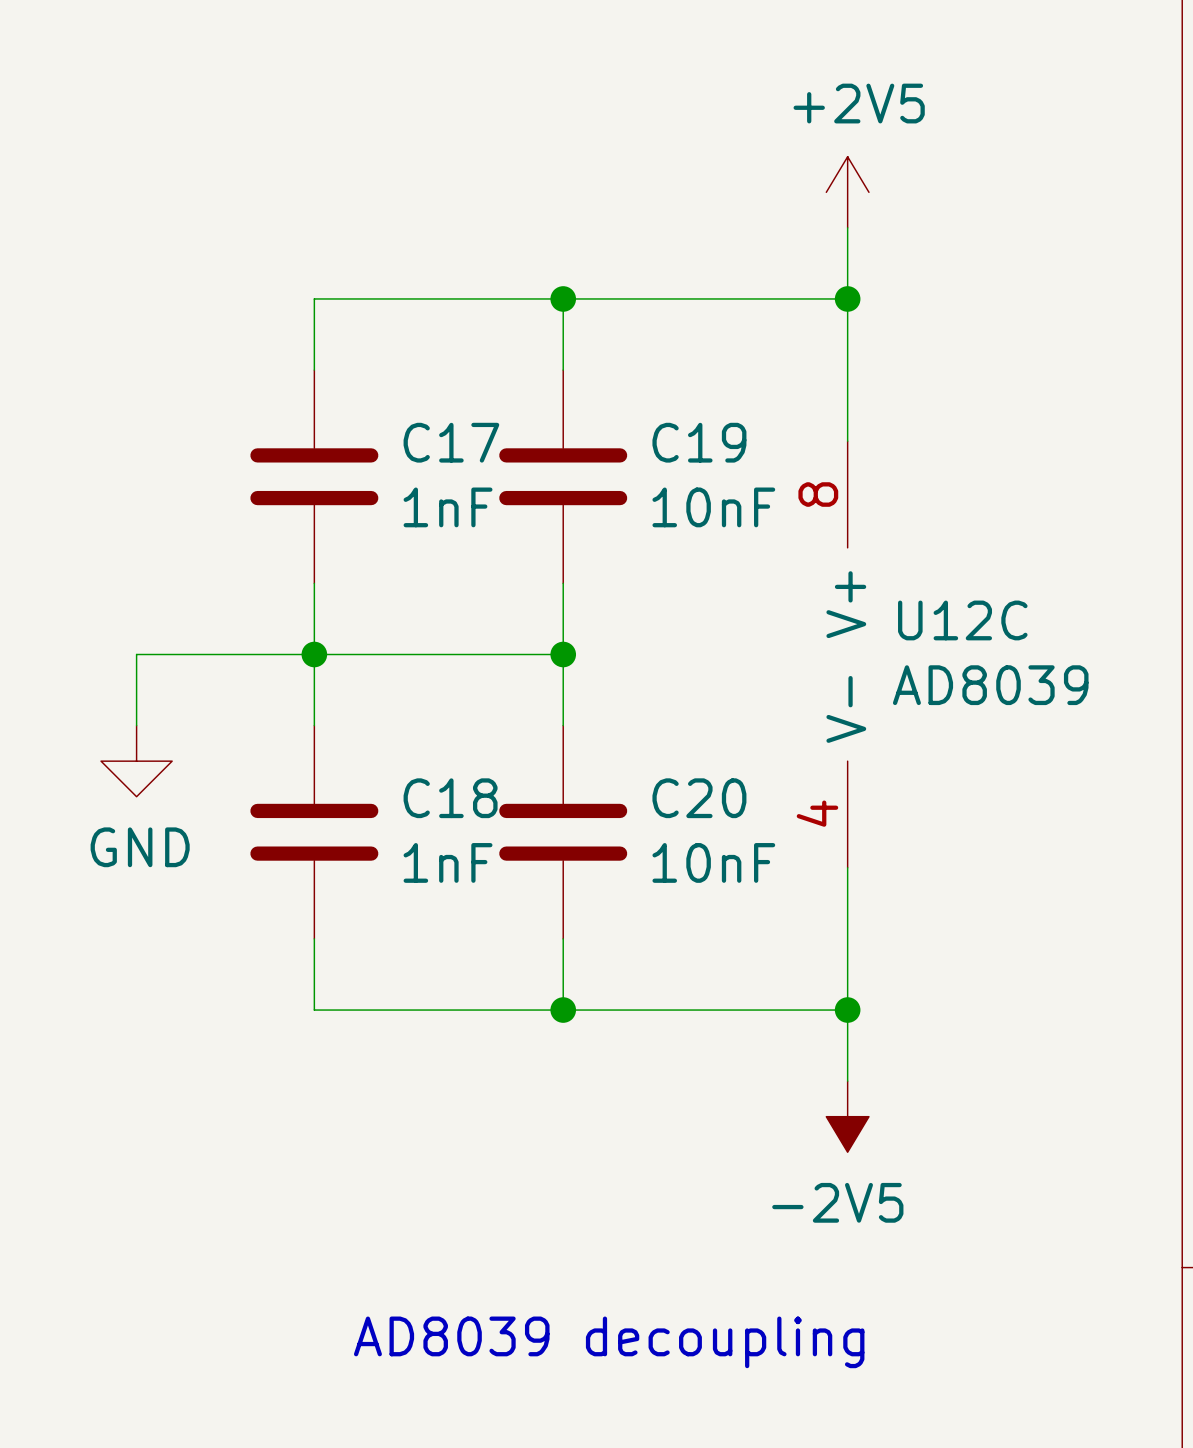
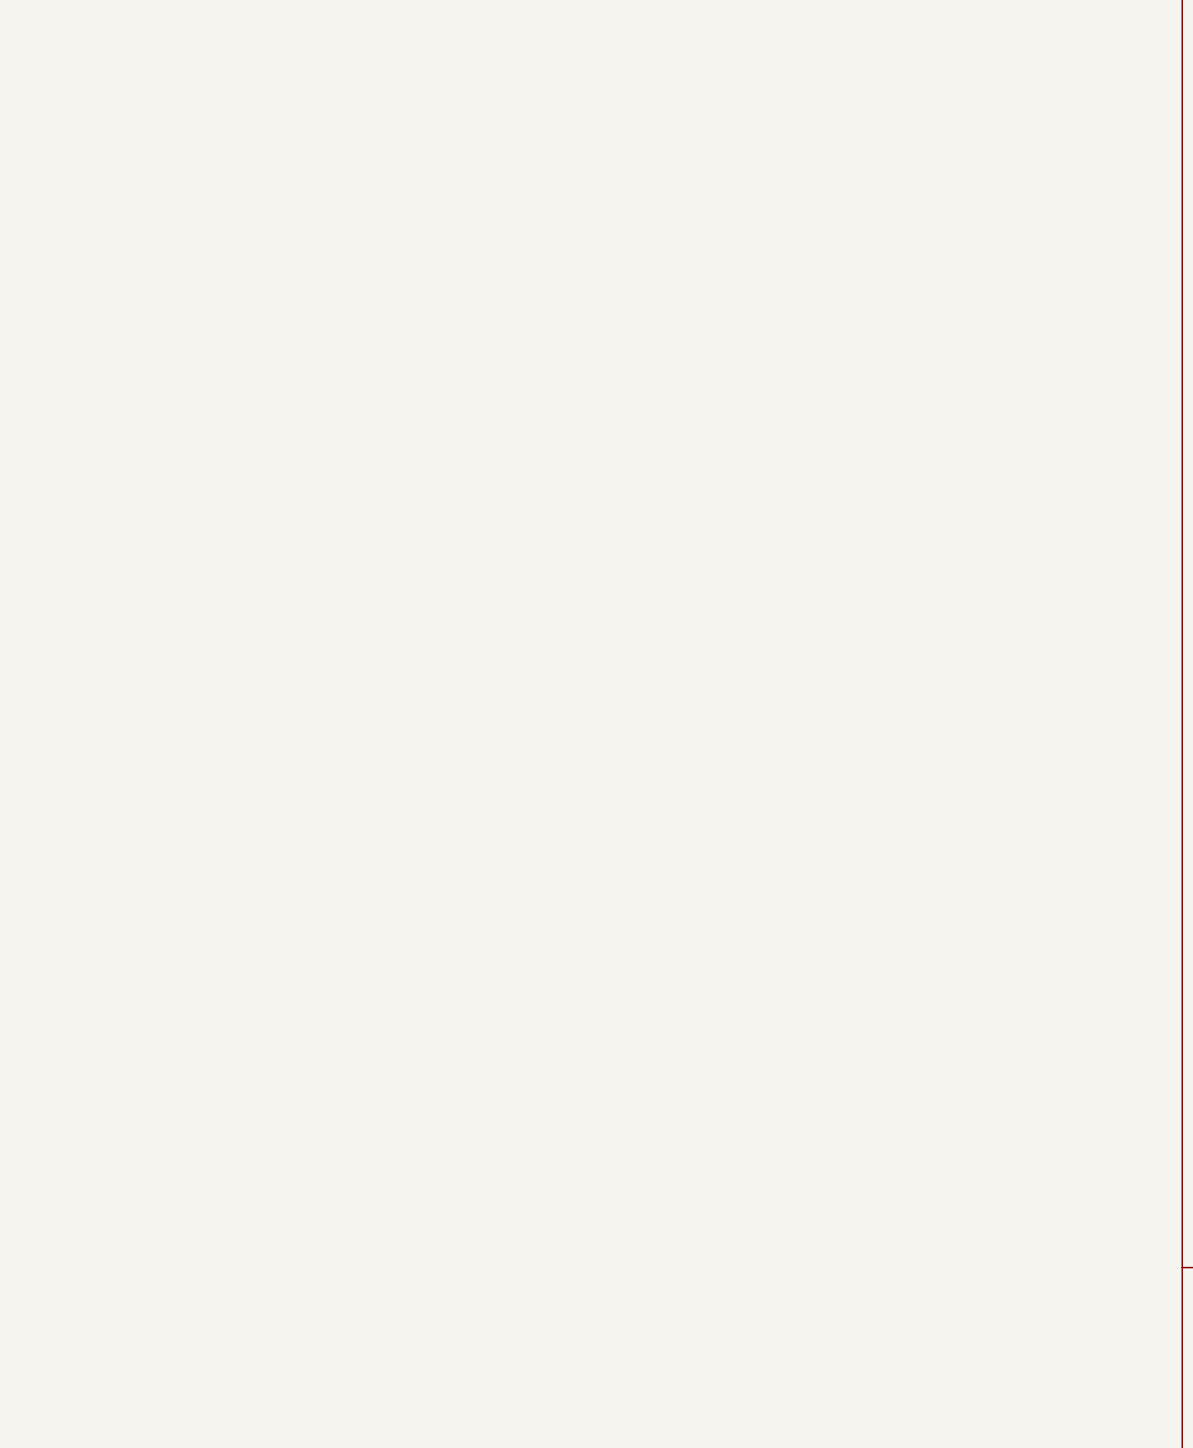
power symbol: +2V5 (847, 192) -> none
wire: (847, 227) (847, 441) -> none
wire: (563, 298) (563, 370) -> none
junction: (563, 298) -> none
wire: (847, 298) (314, 298) (314, 370) -> none
junction: (847, 298) -> none
C17: 1nF (314, 476) -> none
C19: 10nF (563, 476) -> none
wire: (314, 583) (314, 725) -> none
wire: (563, 583) (563, 725) -> none
junction: (314, 654) -> none
wire: (563, 654) (136, 654) (136, 725) -> none
junction: (563, 654) -> none
U12C: AD8039 (847, 654) -> none
power symbol: GND (136, 761) -> none
C18: 1nF (314, 832) -> none
C20: 10nF (563, 832) -> none
wire: (847, 867) (847, 1081) -> none
wire: (314, 938) (314, 1010) (847, 1010) -> none
wire: (563, 938) (563, 1010) -> none
junction: (563, 1010) -> none
junction: (847, 1010) -> none
power symbol: -2V5 (847, 1116) -> none
text: AD8039 decoupling (609, 1342) -> none

